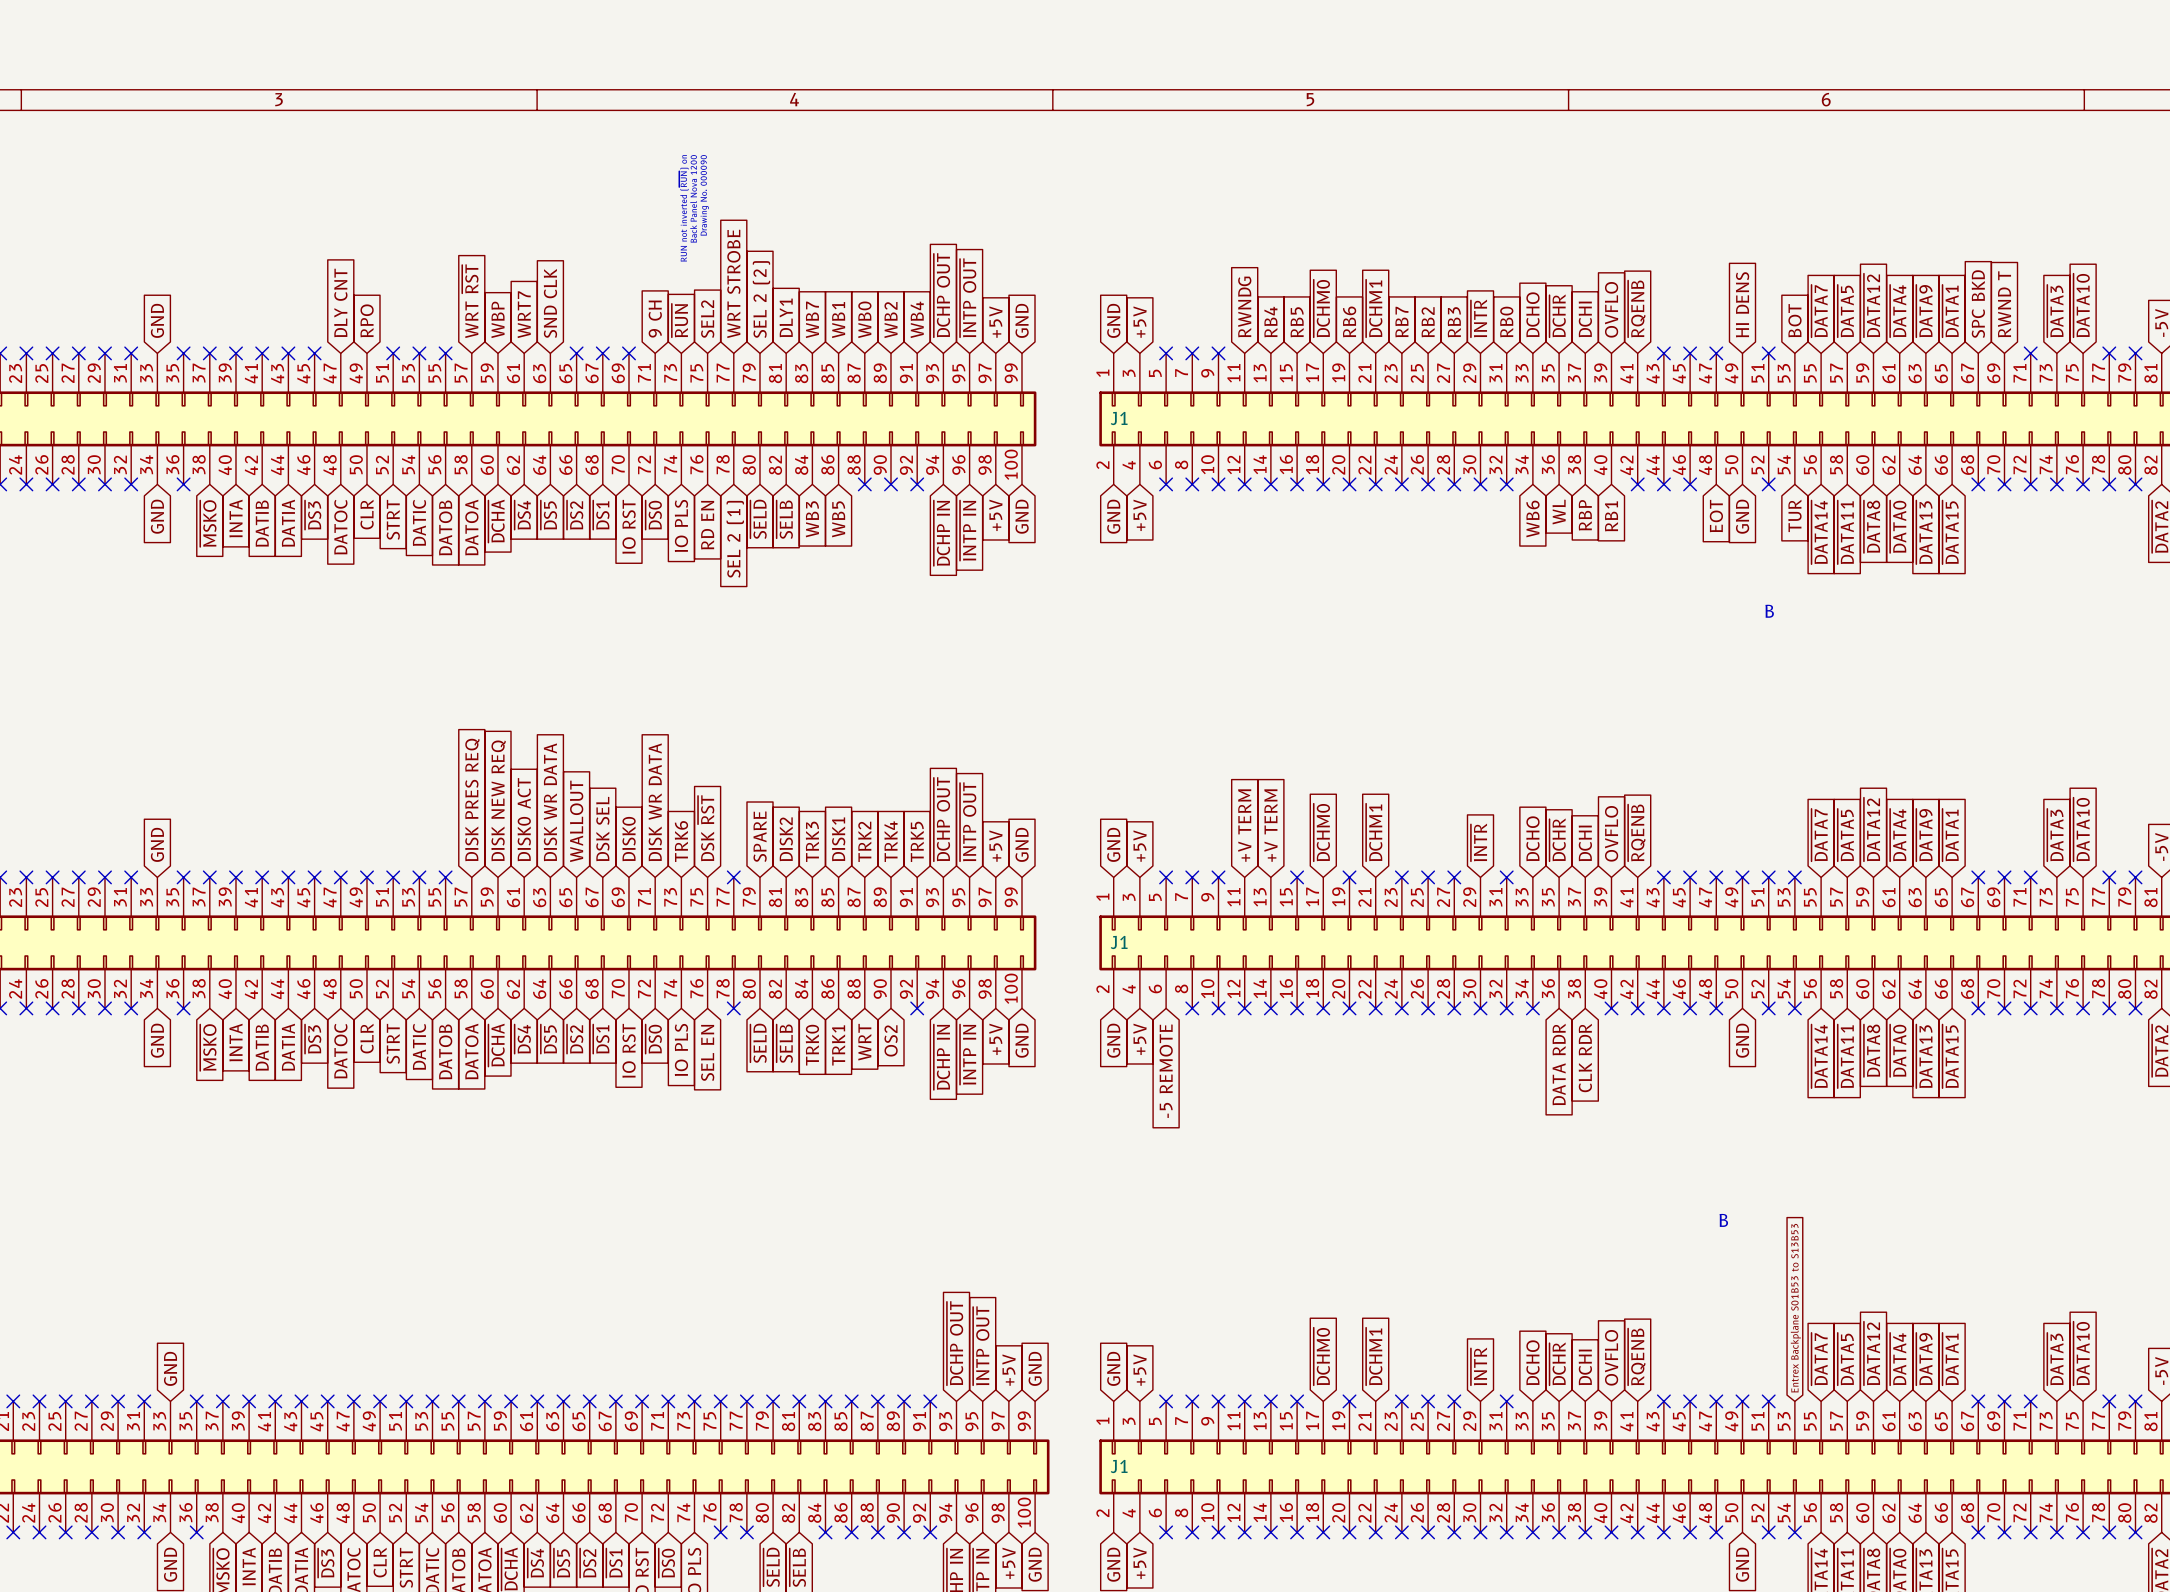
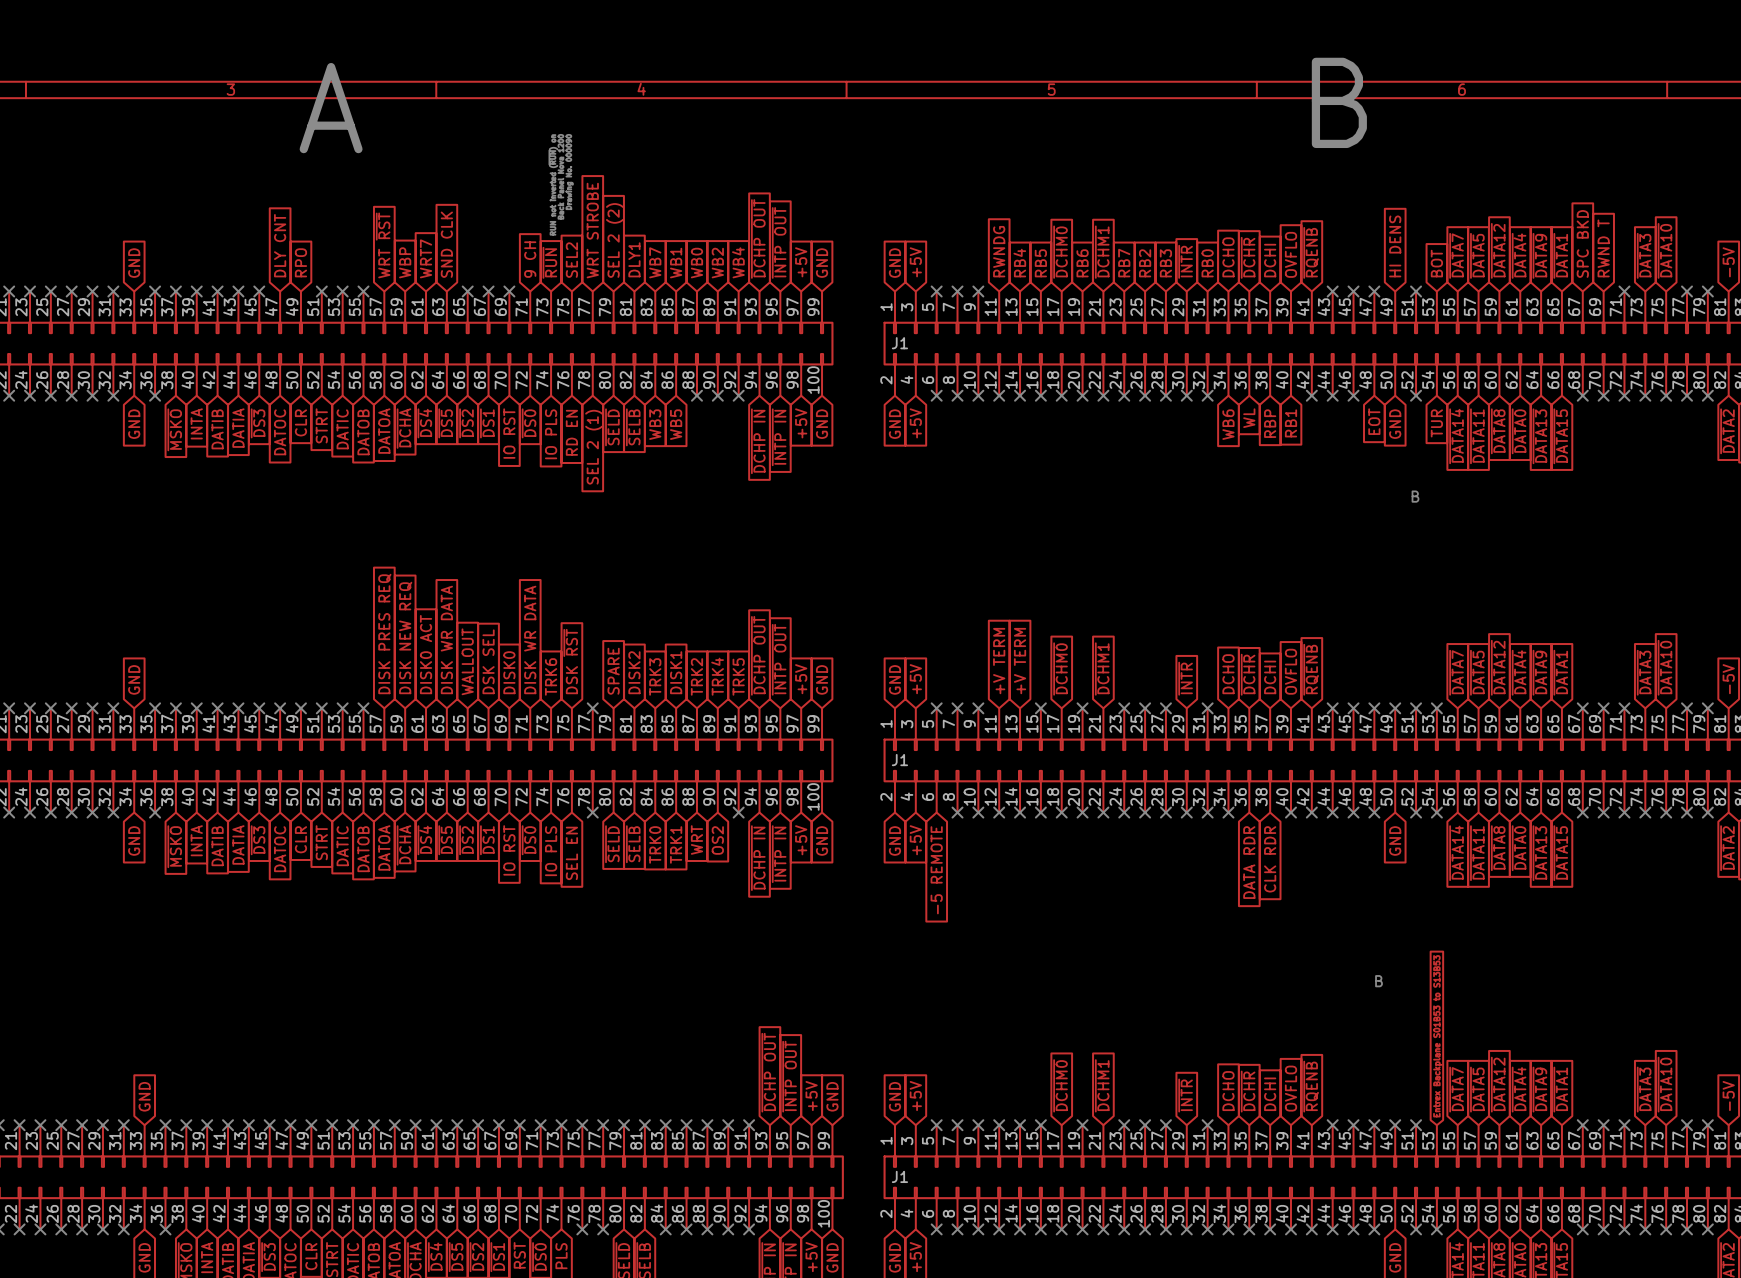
text: none -> B (1339, 102)
text: none -> A (331, 108)

